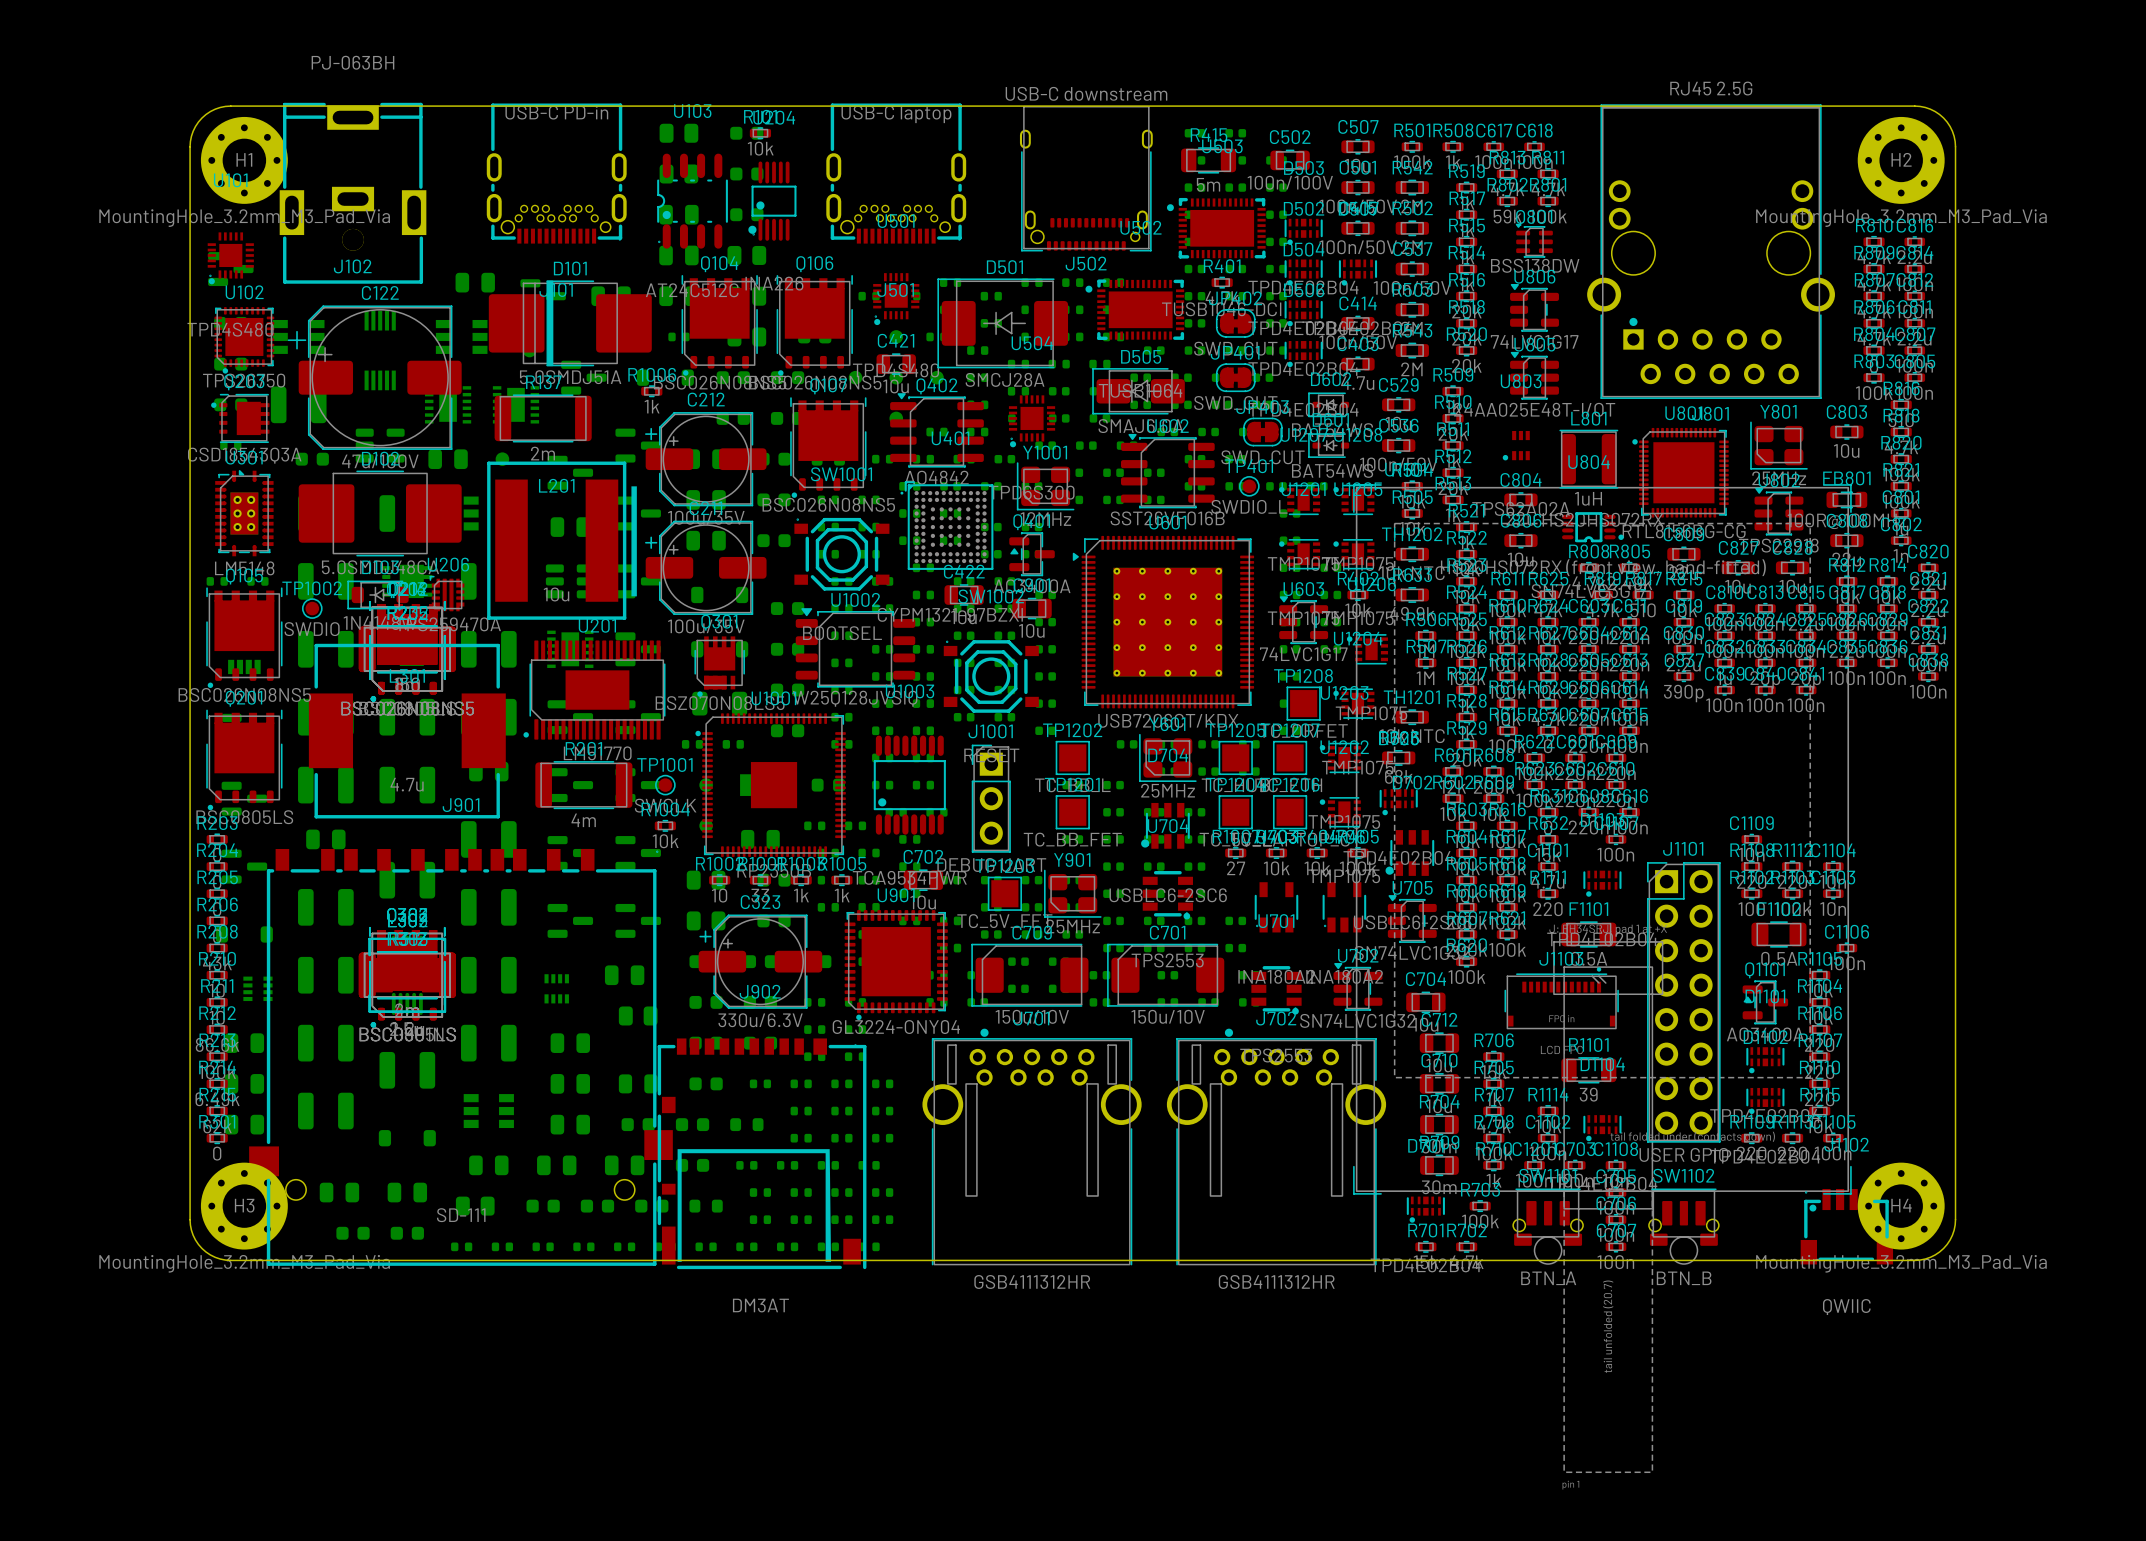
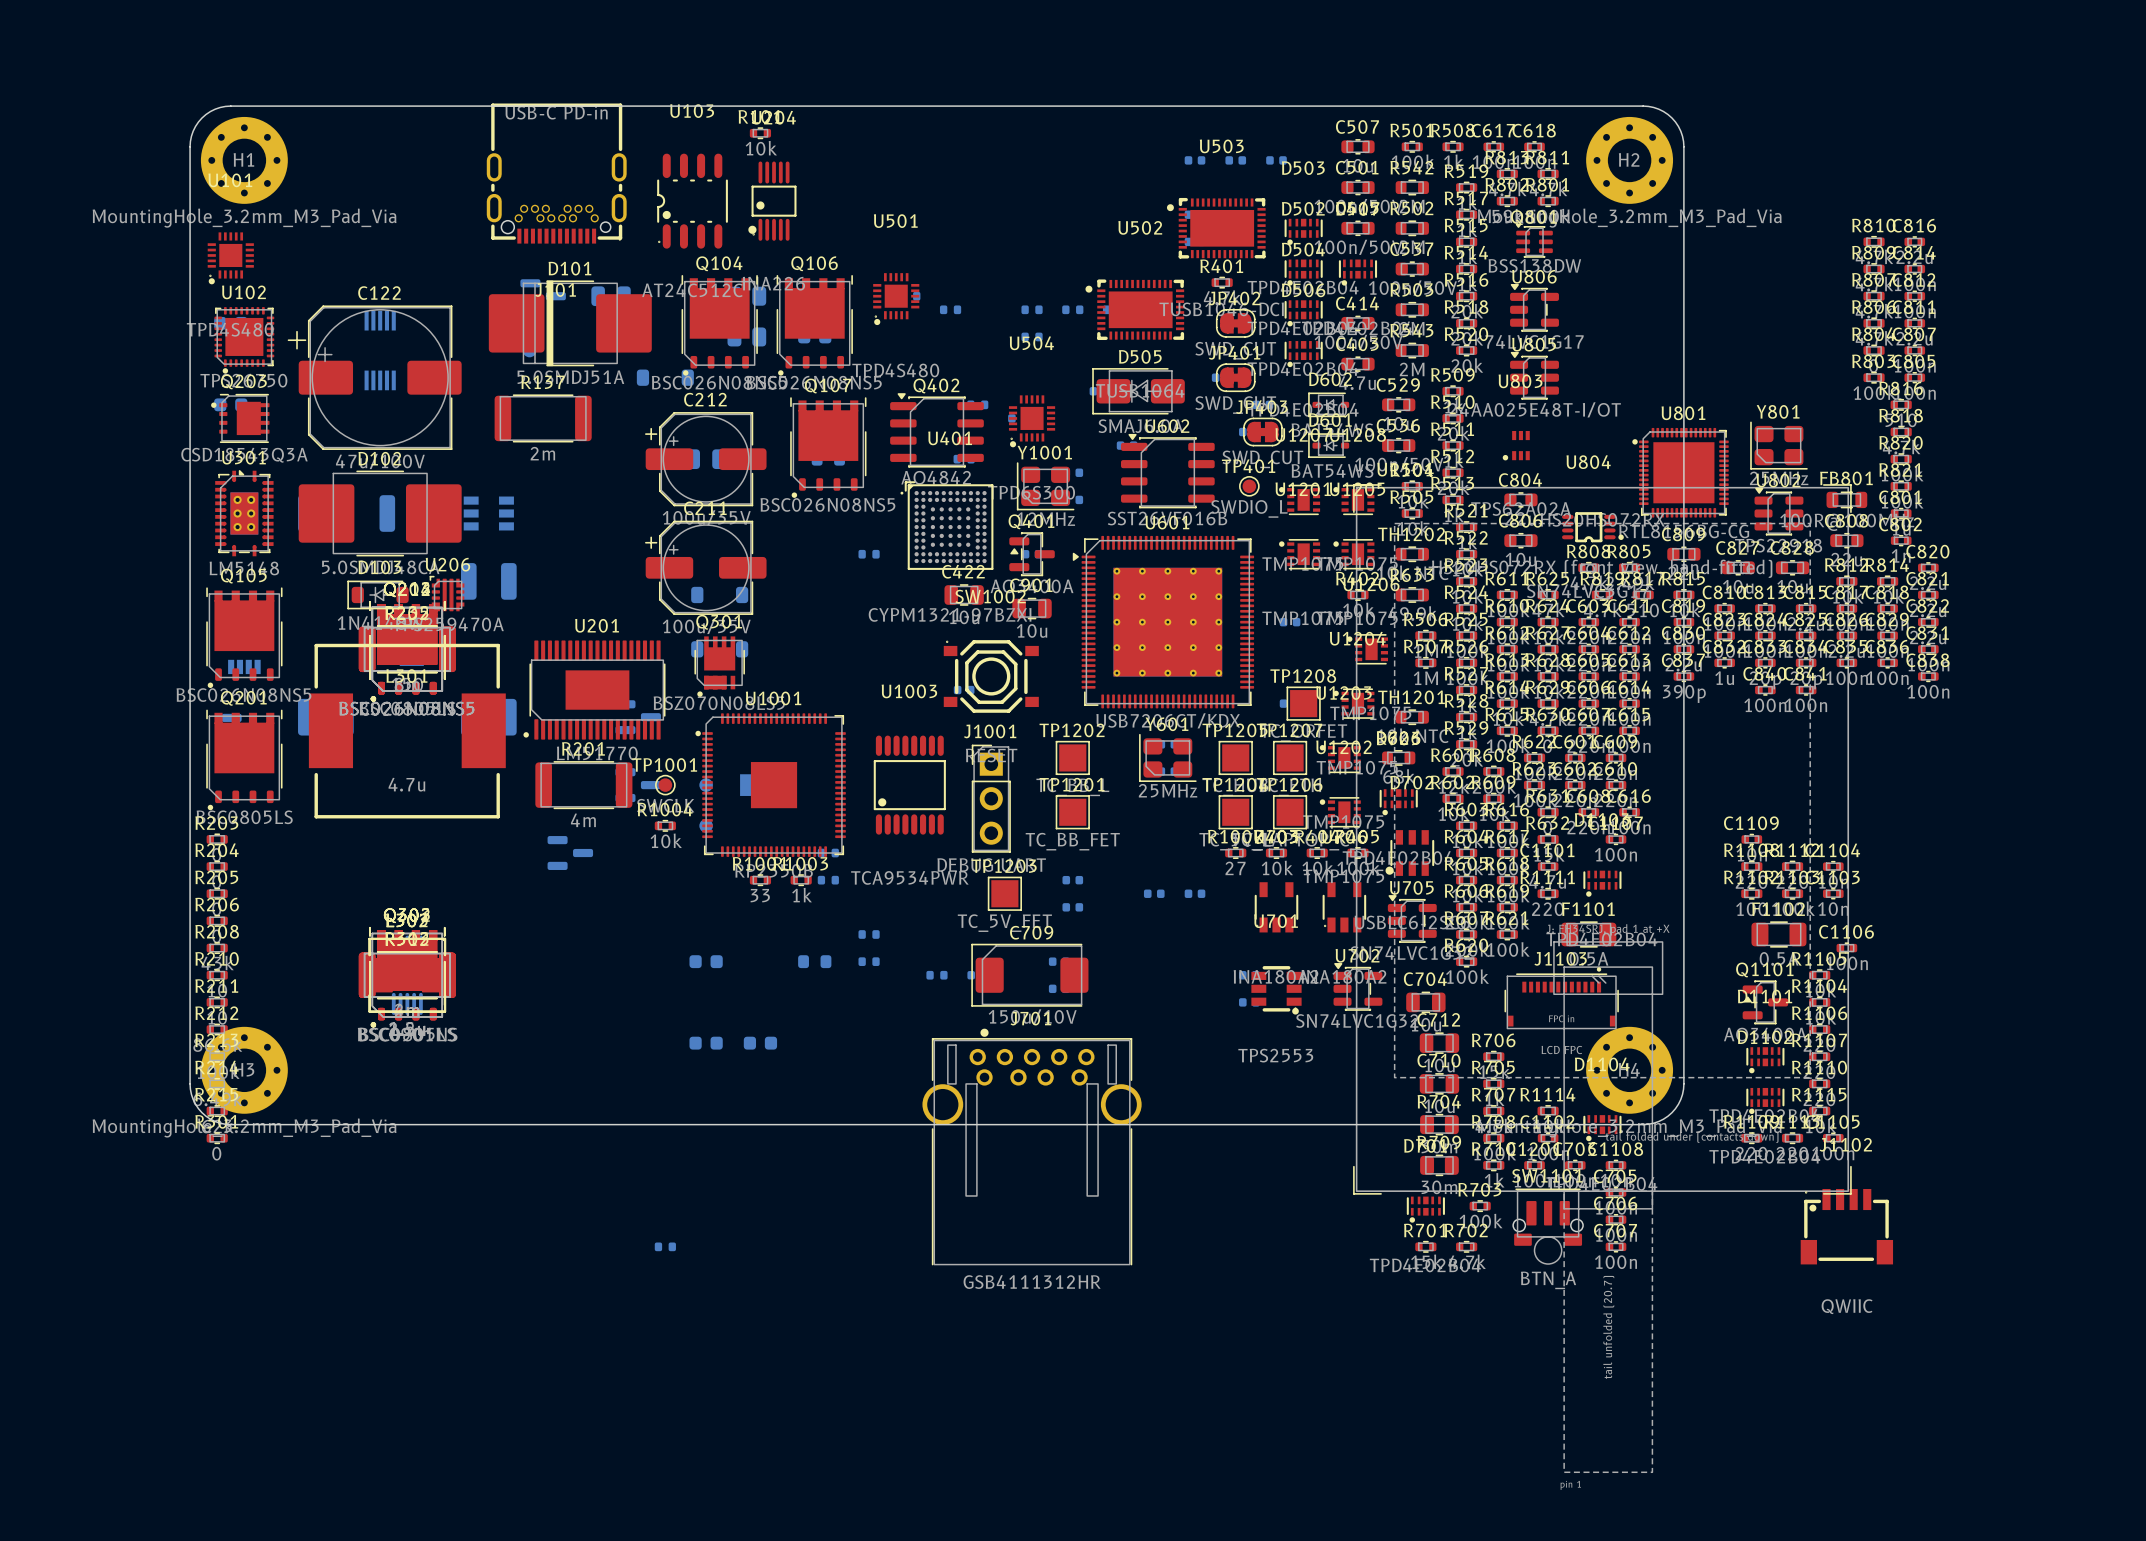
board edge: (1643, 106) (1920, 106) (1935, 111) (1943, 118) (1954, 136) (1955, 1219) (1950, 1240) (1939, 1252) (1930, 1257) (1914, 1260) (225, 1260) (210, 1254) (201, 1248) (191, 1230) (190, 1083) -> (1643, 106) (1658, 109) (1671, 118) (1680, 131) (1683, 146) (1683, 1083) (1680, 1099) (1667, 1116) (1653, 1123) (1643, 1124) (230, 1124) (215, 1121) (201, 1112) (193, 1099) (190, 1083)
part: (678, 133) -> none
part: (746, 133) -> none
part: (1195, 133) -> none
part: (1235, 133) -> none
R415: 5m (1208, 160) -> none
C502: 100n/100V (1290, 160) -> none
H2 position: (1901, 160) -> (1629, 160)
part: (678, 173) -> none
part: (746, 173) -> none
J501: USB-C laptop (896, 173) -> none
J502: USB-C downstream (1086, 178) -> none
part: (1195, 187) -> none
part: (1235, 187) -> none
part: (1276, 187) -> none
J102: PJ-063BH (353, 193) -> none
part: (678, 214) -> none
part: (746, 214) -> none
part: (1276, 214) -> none
part: (1276, 241) -> none
J801: RJ45 2.5G (1711, 251) -> none
part: (678, 255) -> none
part: (746, 255) -> none
part: (230, 269) -> none
part: (1195, 269) -> none
part: (1235, 269) -> none
part: (1276, 269) -> none
part: (475, 282) -> none
part: (950, 282) -> none
part: (1032, 282) -> none
part: (1072, 282) -> none
part: (1113, 282) -> none
part: (678, 296) -> none
part: (869, 296) -> none
part: (991, 296) -> none
part: (1195, 296) -> none
part: (1235, 296) -> none
part: (1276, 296) -> none
part: (991, 323) -> none
D501: SMCJ28A (1002, 323) -> none
part: (1195, 323) -> none
part: (1276, 323) -> none
part: (298, 336) -> none
part: (461, 336) -> none
part: (678, 336) -> none
part: (896, 336) -> none
part: (936, 336) -> none
part: (1072, 336) -> none
part: (1113, 336) -> none
part: (977, 350) -> none
part: (1154, 350) -> none
part: (1195, 350) -> none
part: (1235, 350) -> none
part: (1276, 350) -> none
part: (230, 364) -> none
C421: 10u (896, 364) -> none
part: (1018, 364) -> none
part: (1059, 364) -> none
part: (1099, 364) -> none
part: (583, 377) -> none
part: (733, 377) -> none
part: (787, 377) -> none
part: (855, 377) -> none
part: (896, 377) -> none
part: (937, 377) -> none
part: (977, 377) -> none
part: (1140, 377) -> none
part: (1181, 377) -> none
part: (1262, 377) -> none
R1006: 1k (651, 391) -> none
part: (1018, 391) -> none
part: (1059, 391) -> none
part: (298, 404) -> none
part: (448, 404) -> none
part: (515, 404) -> none
part: (1140, 404) -> none
part: (1181, 404) -> none
part: (1222, 404) -> none
part: (733, 418) -> none
part: (787, 418) -> none
part: (896, 418) -> none
part: (1059, 418) -> none
part: (1099, 418) -> none
part: (936, 432) -> none
part: (977, 432) -> none
part: (1167, 432) -> none
part: (1208, 432) -> none
C803: 10u (1846, 432) -> none
part: (230, 445) -> none
part: (380, 445) -> none
part: (638, 445) -> none
part: (1045, 445) -> none
part: (1086, 445) -> none
part: (312, 459) -> none
part: (448, 459) -> none
part: (502, 459) -> none
part: (774, 459) -> none
part: (882, 459) -> none
part: (923, 459) -> none
part: (1004, 459) -> none
part: (1195, 459) -> none
part: (1235, 459) -> none
L801: 1uH (1588, 459) -> none
part: (570, 472) -> none
part: (1113, 472) -> none
part: (1154, 472) -> none
part: (909, 486) -> none
part: (950, 486) -> none
part: (991, 486) -> none
part: (1032, 486) -> none
part: (1195, 486) -> none
part: (1235, 486) -> none
part: (1276, 486) -> none
part: (1317, 486) -> none
part: (706, 499) -> none
part: (774, 499) -> none
part: (828, 499) -> none
part: (869, 499) -> none
part: (1113, 499) -> none
part: (1154, 499) -> none
part: (638, 513) -> none
part: (909, 513) -> none
part: (950, 513) -> none
part: (1290, 513) -> none
part: (570, 527) -> none
part: (828, 527) -> none
part: (869, 527) -> none
part: (991, 527) -> none
part: (1032, 527) -> none
L201: 10u (561, 540) -> none
part: (706, 540) -> none
part: (774, 540) -> none
part: (909, 540) -> none
part: (950, 540) -> none
part: (1290, 540) -> none
part: (828, 554) -> none
SW1001: BOOTSEL (841, 554) -> none
part: (991, 554) -> none
part: (923, 567) -> none
part: (1290, 567) -> none
part: (1330, 567) -> none
part: (217, 581) -> none
part: (257, 581) -> none
part: (325, 581) -> none
part: (407, 581) -> none
part: (570, 581) -> none
part: (638, 581) -> none
part: (841, 581) -> none
part: (882, 581) -> none
part: (964, 581) -> none
part: (1004, 581) -> none
part: (923, 594) -> none
part: (1045, 594) -> none
part: (1290, 594) -> none
part: (1330, 594) -> none
TP1002: SWDIO (312, 608) -> none
part: (787, 608) -> none
part: (841, 608) -> none
part: (882, 608) -> none
part: (964, 608) -> none
part: (1004, 608) -> none
U603: 74LVC1G17 (1303, 620) -> none
part: (923, 622) -> none
part: (1045, 622) -> none
part: (1330, 622) -> none
part: (841, 635) -> none
part: (964, 635) -> none
part: (1004, 635) -> none
U1002: W25Q128JVSIQ (855, 647) -> none
part: (325, 649) -> none
part: (488, 649) -> none
part: (570, 649) -> none
part: (638, 649) -> none
part: (787, 649) -> none
part: (882, 649) -> none
part: (923, 649) -> none
part: (1045, 649) -> none
part: (1290, 649) -> none
part: (1330, 649) -> none
part: (841, 662) -> none
part: (964, 662) -> none
part: (1004, 662) -> none
part: (882, 676) -> none
part: (923, 676) -> none
part: (1045, 676) -> none
part: (1290, 676) -> none
part: (787, 690) -> none
part: (841, 690) -> none
part: (1004, 690) -> none
C839: 100n (1724, 690) -> none
part: (719, 703) -> none
part: (882, 703) -> none
part: (923, 703) -> none
part: (1045, 703) -> none
part: (407, 717) -> none
part: (570, 717) -> none
part: (841, 717) -> none
part: (964, 717) -> none
part: (1004, 717) -> none
part: (787, 730) -> none
part: (882, 730) -> none
part: (923, 730) -> none
part: (1045, 730) -> none
part: (1290, 730) -> none
part: (692, 744) -> none
part: (733, 744) -> none
part: (841, 744) -> none
part: (1127, 744) -> none
part: (1208, 744) -> none
part: (1249, 744) -> none
part: (882, 757) -> none
part: (923, 757) -> none
part: (488, 771) -> none
part: (1208, 771) -> none
part: (1249, 771) -> none
part: (325, 785) -> none
part: (407, 785) -> none
part: (570, 785) -> none
part: (828, 785) -> none
part: (882, 785) -> none
part: (923, 785) -> none
part: (1072, 785) -> none
part: (1113, 785) -> none
part: (244, 798) -> none
part: (896, 812) -> none
part: (936, 812) -> none
part: (1113, 812) -> none
part: (1154, 812) -> none
part: (1195, 812) -> none
part: (814, 825) -> none
part: (855, 825) -> none
D704: USBLC6-2SC6 (1165, 825) -> none
part: (325, 839) -> none
part: (488, 839) -> none
part: (760, 839) -> none
part: (909, 839) -> none
part: (1072, 839) -> none
part: (1113, 839) -> none
part: (1154, 839) -> none
part: (1195, 839) -> none
part: (638, 853) -> none
part: (869, 853) -> none
part: (244, 866) -> none
part: (909, 866) -> none
part: (1113, 866) -> none
part: (1154, 866) -> none
part: (1195, 866) -> none
part: (407, 880) -> none
part: (706, 880) -> none
R1002: 10 (719, 880) -> none
part: (774, 880) -> none
R1005: 1k (841, 880) -> none
part: (869, 880) -> none
C702: 10u (923, 880) -> none
part: (950, 880) -> none
part: (991, 880) -> none
part: (1032, 880) -> none
part: (909, 893) -> none
Y901: 25MHz (1072, 893) -> none
part: (1113, 893) -> none
U704: TPS2553 (1167, 895) -> none
part: (325, 907) -> none
part: (488, 907) -> none
part: (828, 907) -> none
part: (869, 907) -> none
part: (991, 907) -> none
part: (1032, 907) -> none
part: (570, 920) -> none
part: (638, 920) -> none
part: (706, 920) -> none
part: (774, 920) -> none
part: (909, 920) -> none
part: (950, 920) -> none
part: (1113, 920) -> none
part: (1154, 920) -> none
part: (1195, 920) -> none
part: (1235, 920) -> none
part: (244, 934) -> none
part: (991, 934) -> none
part: (1032, 934) -> none
part: (1072, 934) -> none
part: (950, 948) -> none
part: (1113, 948) -> none
part: (1154, 948) -> none
part: (1195, 948) -> none
part: (1235, 948) -> none
C323: 330u/6.3V (760, 961) -> none
part: (760, 961) -> none
part: (1018, 961) -> none
U901: GL3224-ONY04 (896, 965) -> none
part: (325, 975) -> none
part: (488, 975) -> none
part: (624, 975) -> none
part: (1099, 975) -> none
C701: 150u/10V (1165, 975) -> none
part: (1167, 975) -> none
part: (257, 988) -> none
part: (556, 988) -> none
part: (1018, 988) -> none
part: (706, 1002) -> none
part: (760, 1002) -> none
part: (814, 1002) -> none
part: (855, 1002) -> none
part: (936, 1002) -> none
part: (977, 1002) -> none
part: (1099, 1002) -> none
part: (1167, 1002) -> none
part: (1208, 1002) -> none
J1101: USER GPIO (1683, 1002) -> none
part: (638, 1015) -> none
part: (814, 1029) -> none
part: (855, 1029) -> none
part: (244, 1043) -> none
part: (325, 1043) -> none
part: (488, 1043) -> none
part: (570, 1043) -> none
part: (814, 1056) -> none
part: (855, 1056) -> none
J901: SD-111 (460, 1057) -> none
part: (407, 1070) -> none
R1101: 39 (1588, 1070) -> none
part: (244, 1083) -> none
part: (570, 1083) -> none
part: (638, 1083) -> none
part: (706, 1083) -> none
part: (760, 1083) -> none
part: (801, 1083) -> none
part: (841, 1083) -> none
part: (882, 1083) -> none
part: (325, 1111) -> none
part: (488, 1111) -> none
part: (801, 1111) -> none
part: (841, 1111) -> none
part: (882, 1111) -> none
part: (244, 1124) -> none
part: (570, 1124) -> none
part: (638, 1124) -> none
part: (692, 1124) -> none
part: (746, 1124) -> none
part: (407, 1138) -> none
part: (801, 1138) -> none
part: (841, 1138) -> none
part: (882, 1138) -> none
J702: GSB4111312HR (1276, 1147) -> none
J902: DM3AT (762, 1153) -> none
part: (488, 1165) -> none
part: (556, 1165) -> none
part: (624, 1165) -> none
part: (692, 1165) -> none
part: (746, 1165) -> none
part: (787, 1165) -> none
part: (828, 1165) -> none
part: (869, 1165) -> none
part: (339, 1192) -> none
part: (407, 1192) -> none
part: (760, 1192) -> none
part: (801, 1192) -> none
part: (841, 1192) -> none
part: (882, 1192) -> none
H3 position: (244, 1206) -> (244, 1070)
part: (475, 1206) -> none
part: (543, 1206) -> none
part: (597, 1206) -> none
part: (651, 1206) -> none
part: (706, 1206) -> none
H4 position: (1901, 1206) -> (1629, 1070)
part: (760, 1219) -> none
part: (801, 1219) -> none
part: (841, 1219) -> none
part: (882, 1219) -> none
SW1102: BTN_B (1683, 1226) -> none
part: (353, 1233) -> none
part: (407, 1233) -> none
part: (461, 1246) -> none
part: (502, 1246) -> none
part: (543, 1246) -> none
part: (583, 1246) -> none
part: (624, 1246) -> none
part: (706, 1246) -> none
part: (746, 1246) -> none
part: (787, 1246) -> none
part: (828, 1246) -> none
part: (869, 1246) -> none

